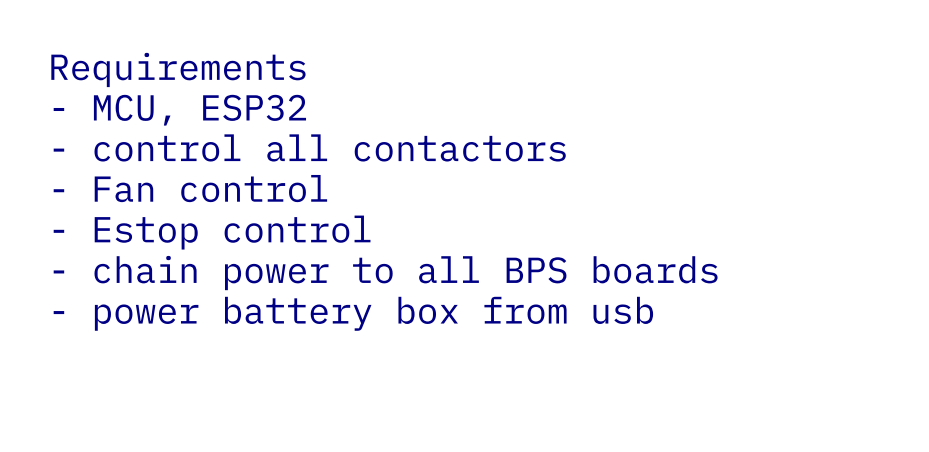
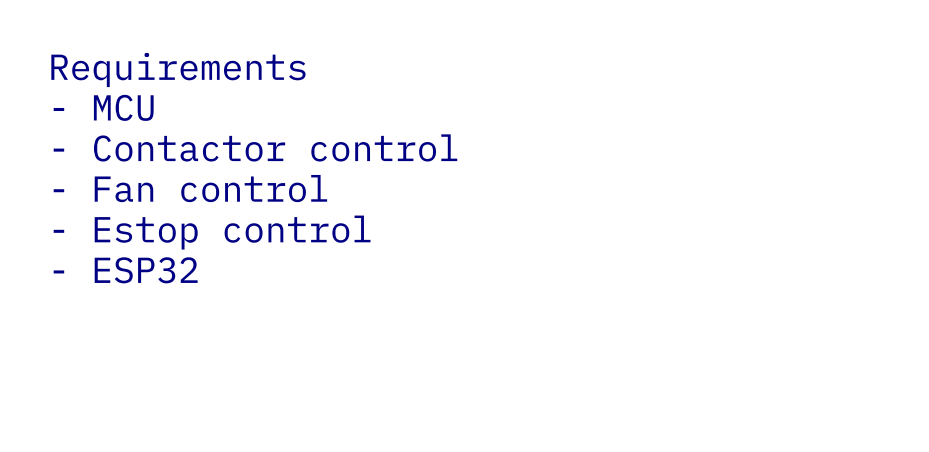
text: - MCU, ESP32 (179, 110) -> - MCU (103, 107)
text: - control all contactors (309, 147) -> - Contactor control (255, 147)
text: - chain power to all BPS boards (385, 273) -> - ESP32 (125, 270)
text: - power battery box from usb (353, 313) -> none

